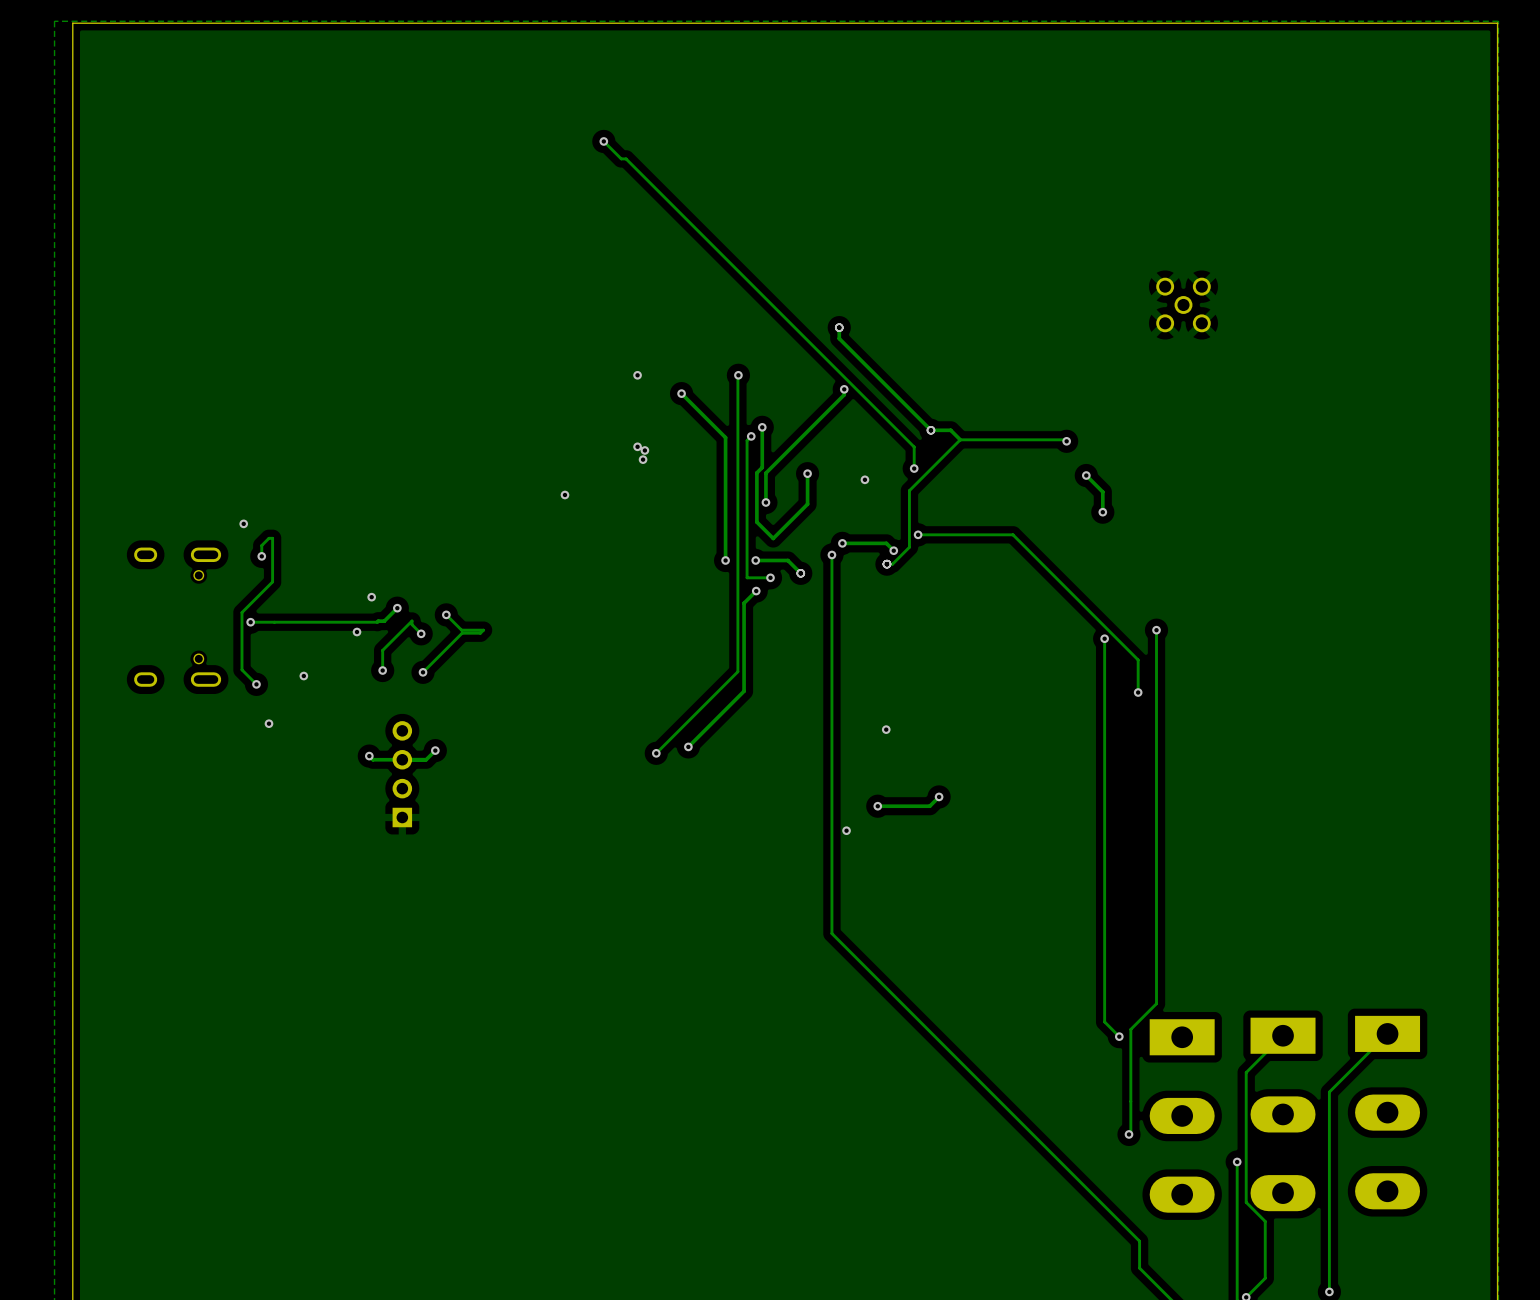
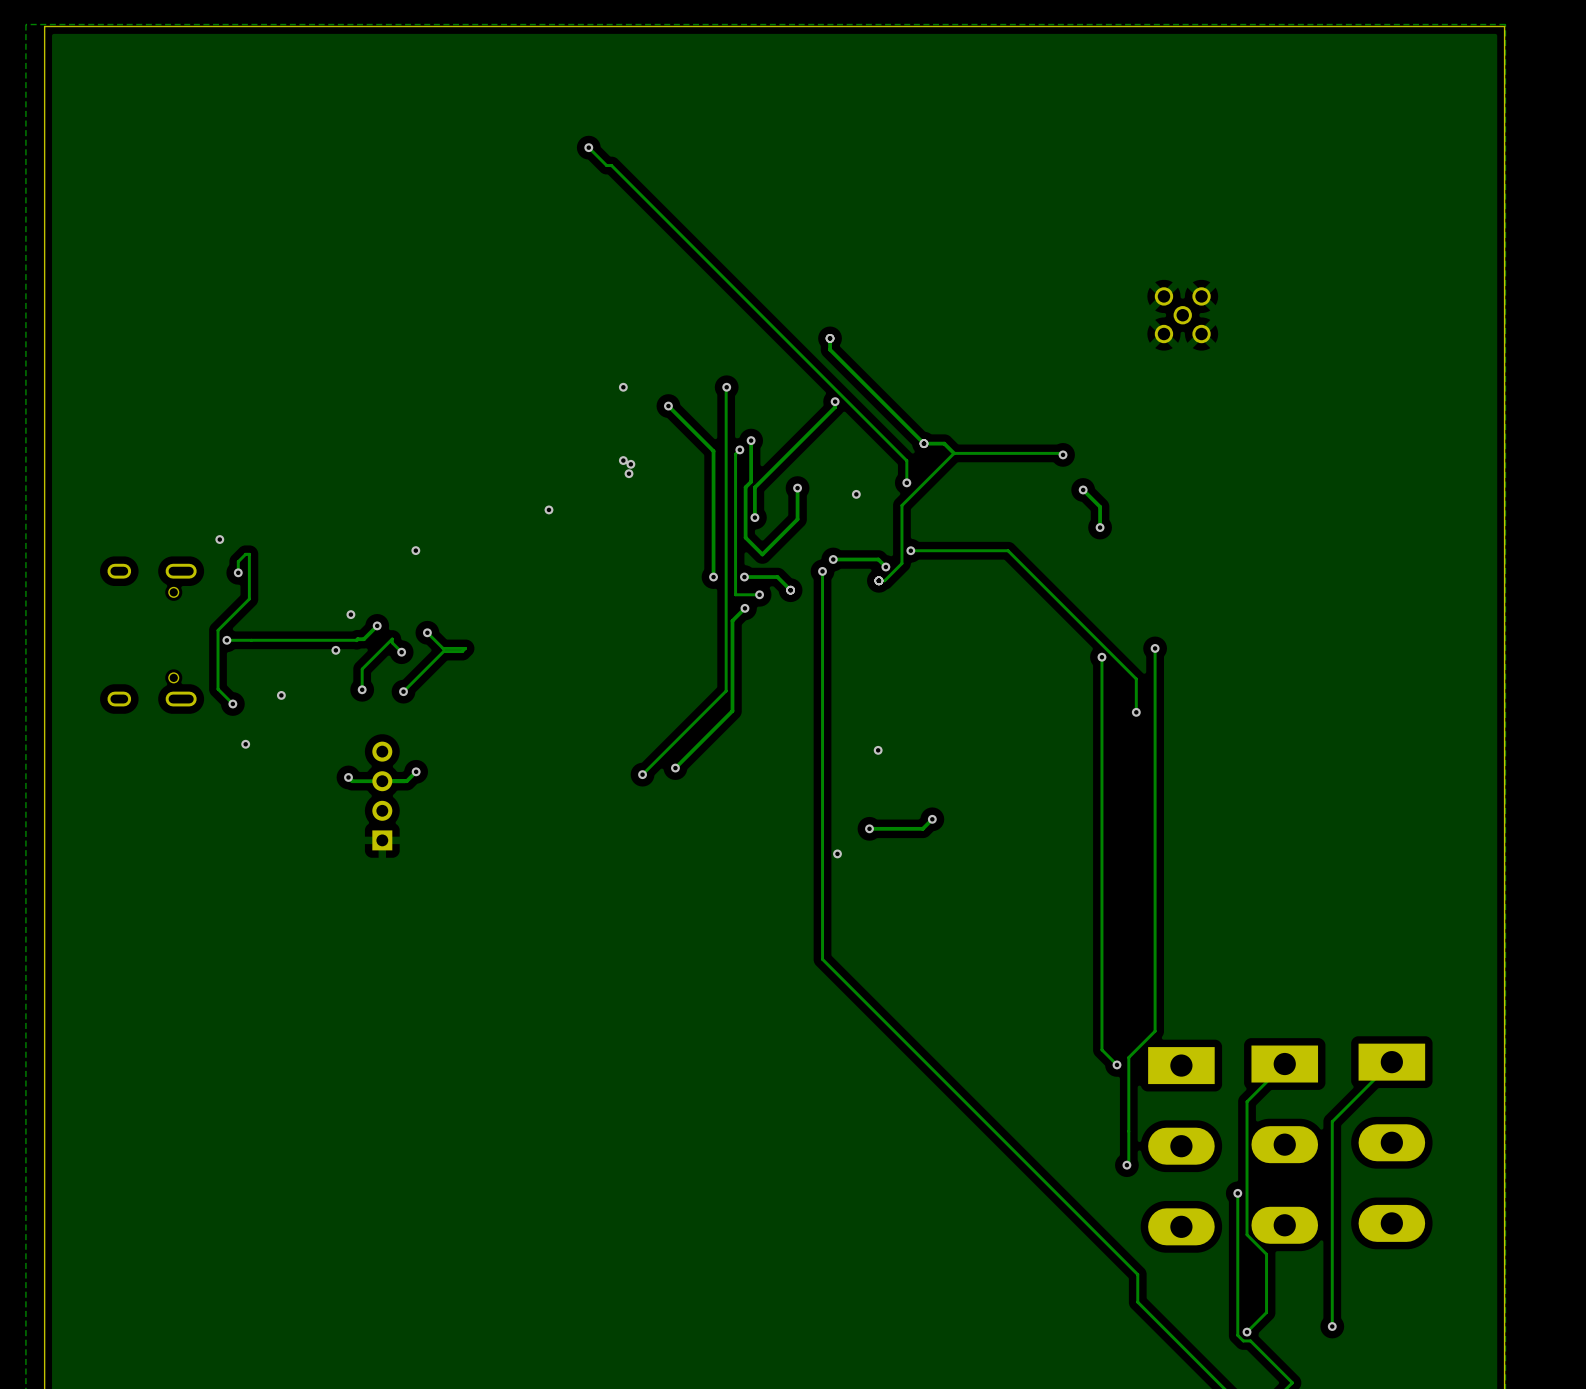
via: none -> (415, 550)

